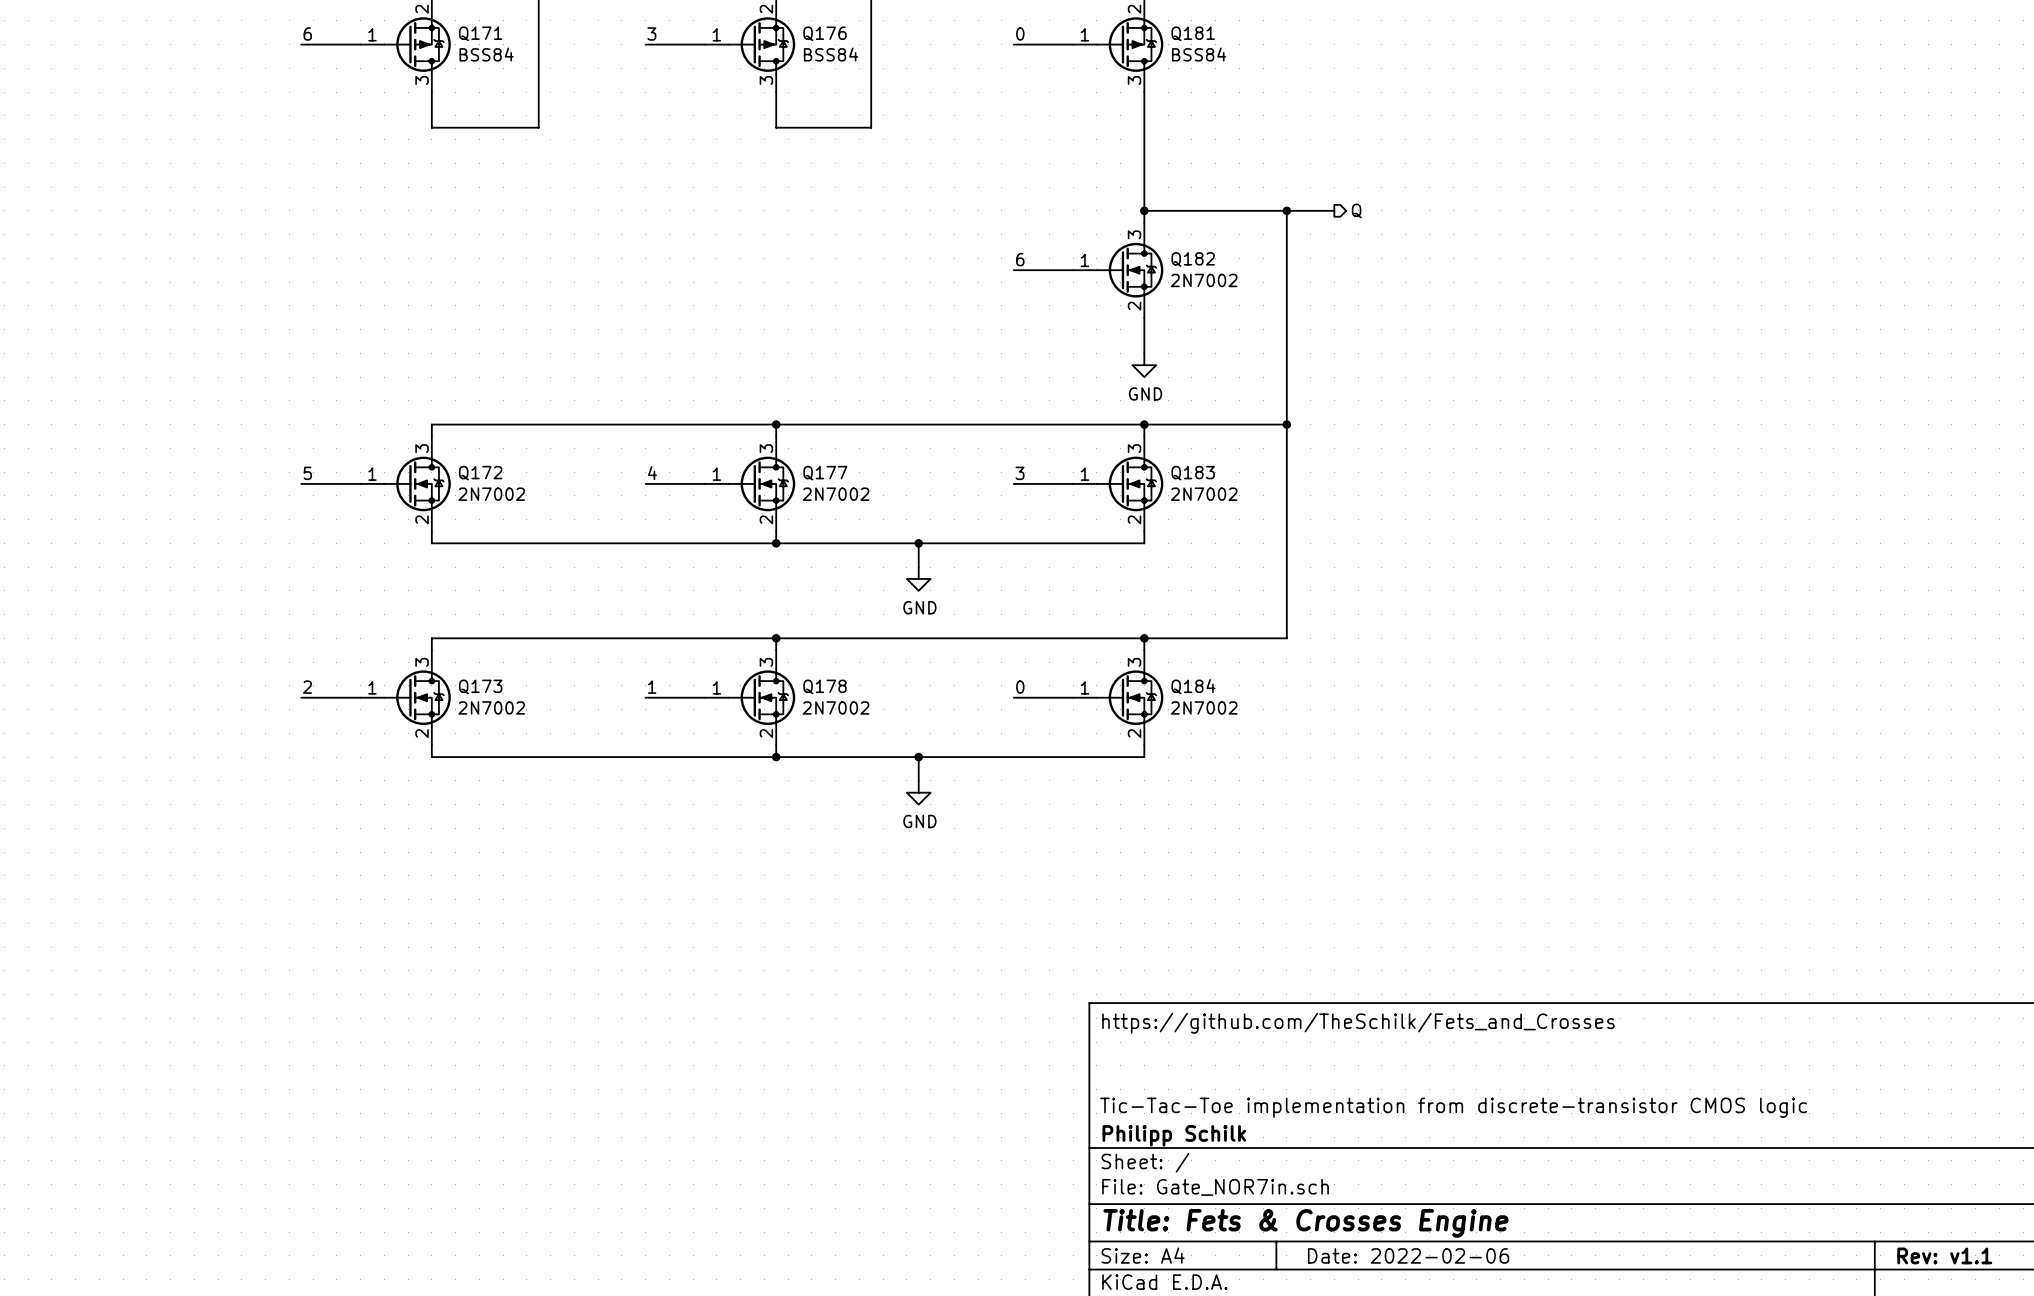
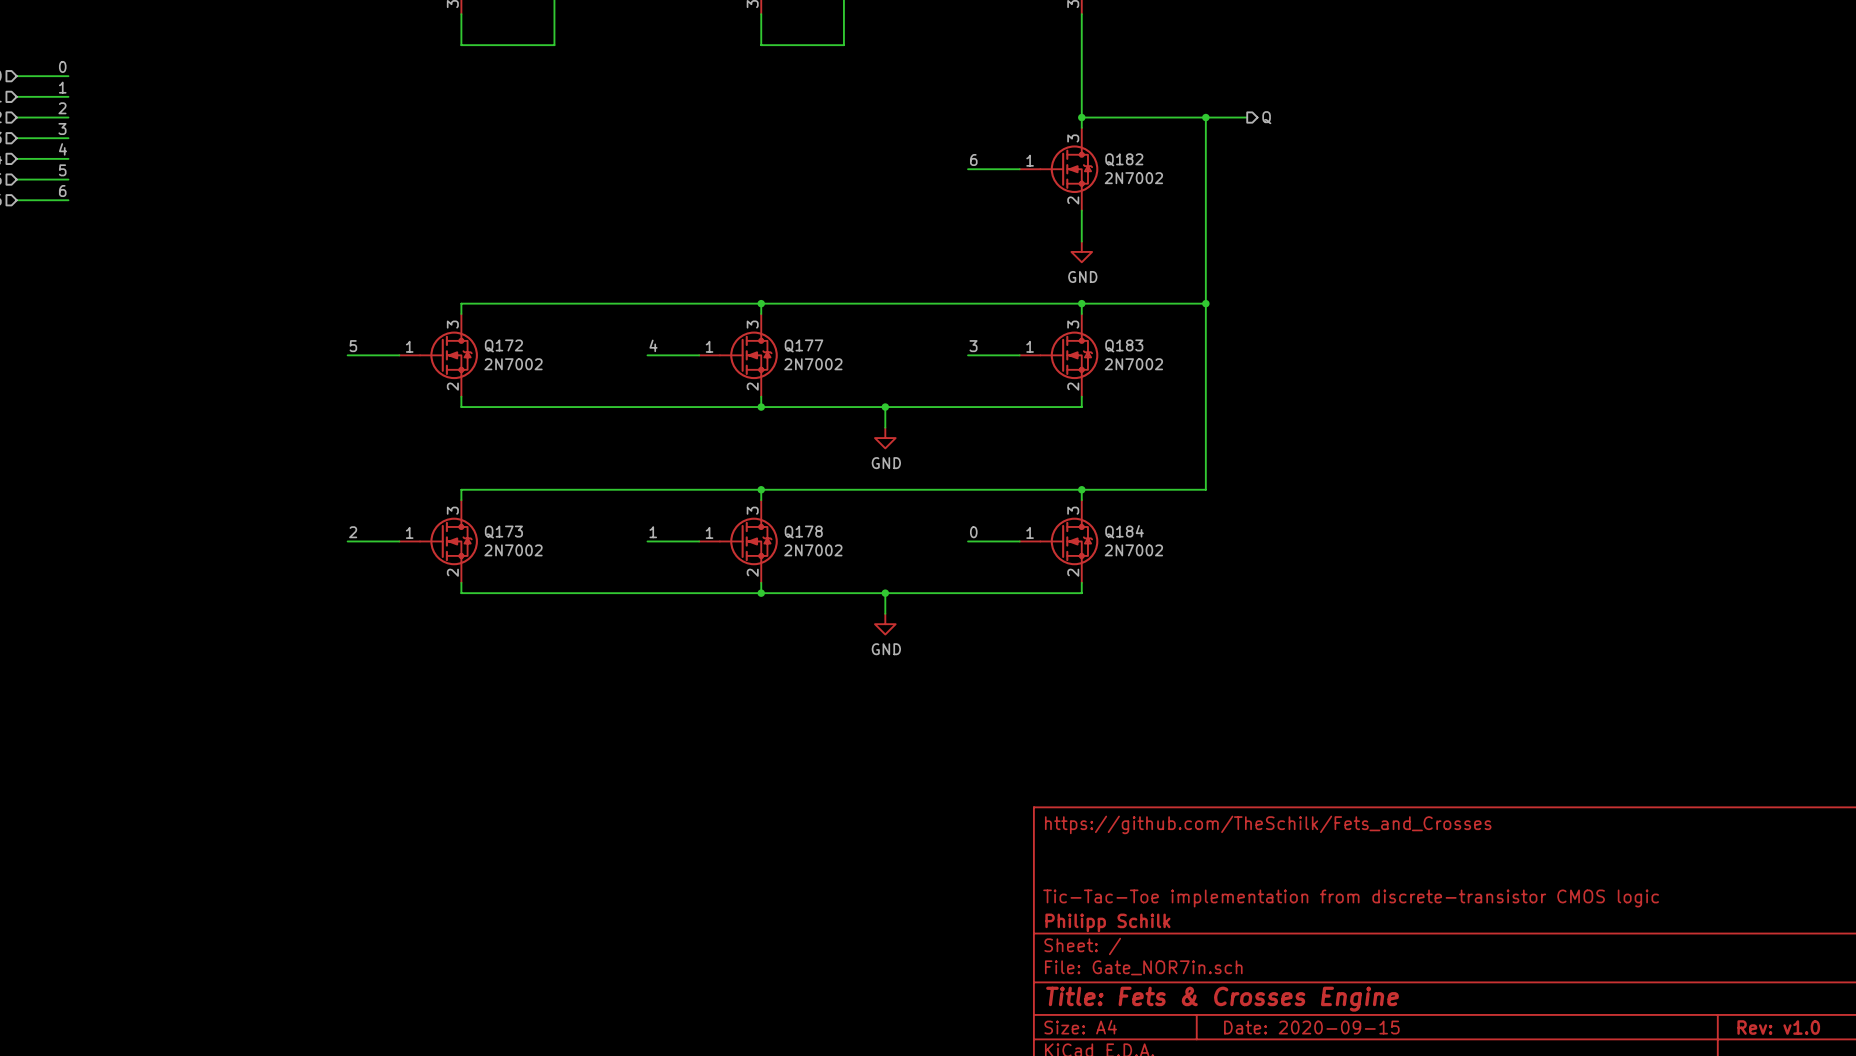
title block: Date: 2022-02-06 (1408, 1255) -> Date: 2020-09-15 (1311, 1027)
title block: Rev: v1.1 (1944, 1255) -> Rev: v1.0 (1778, 1027)

